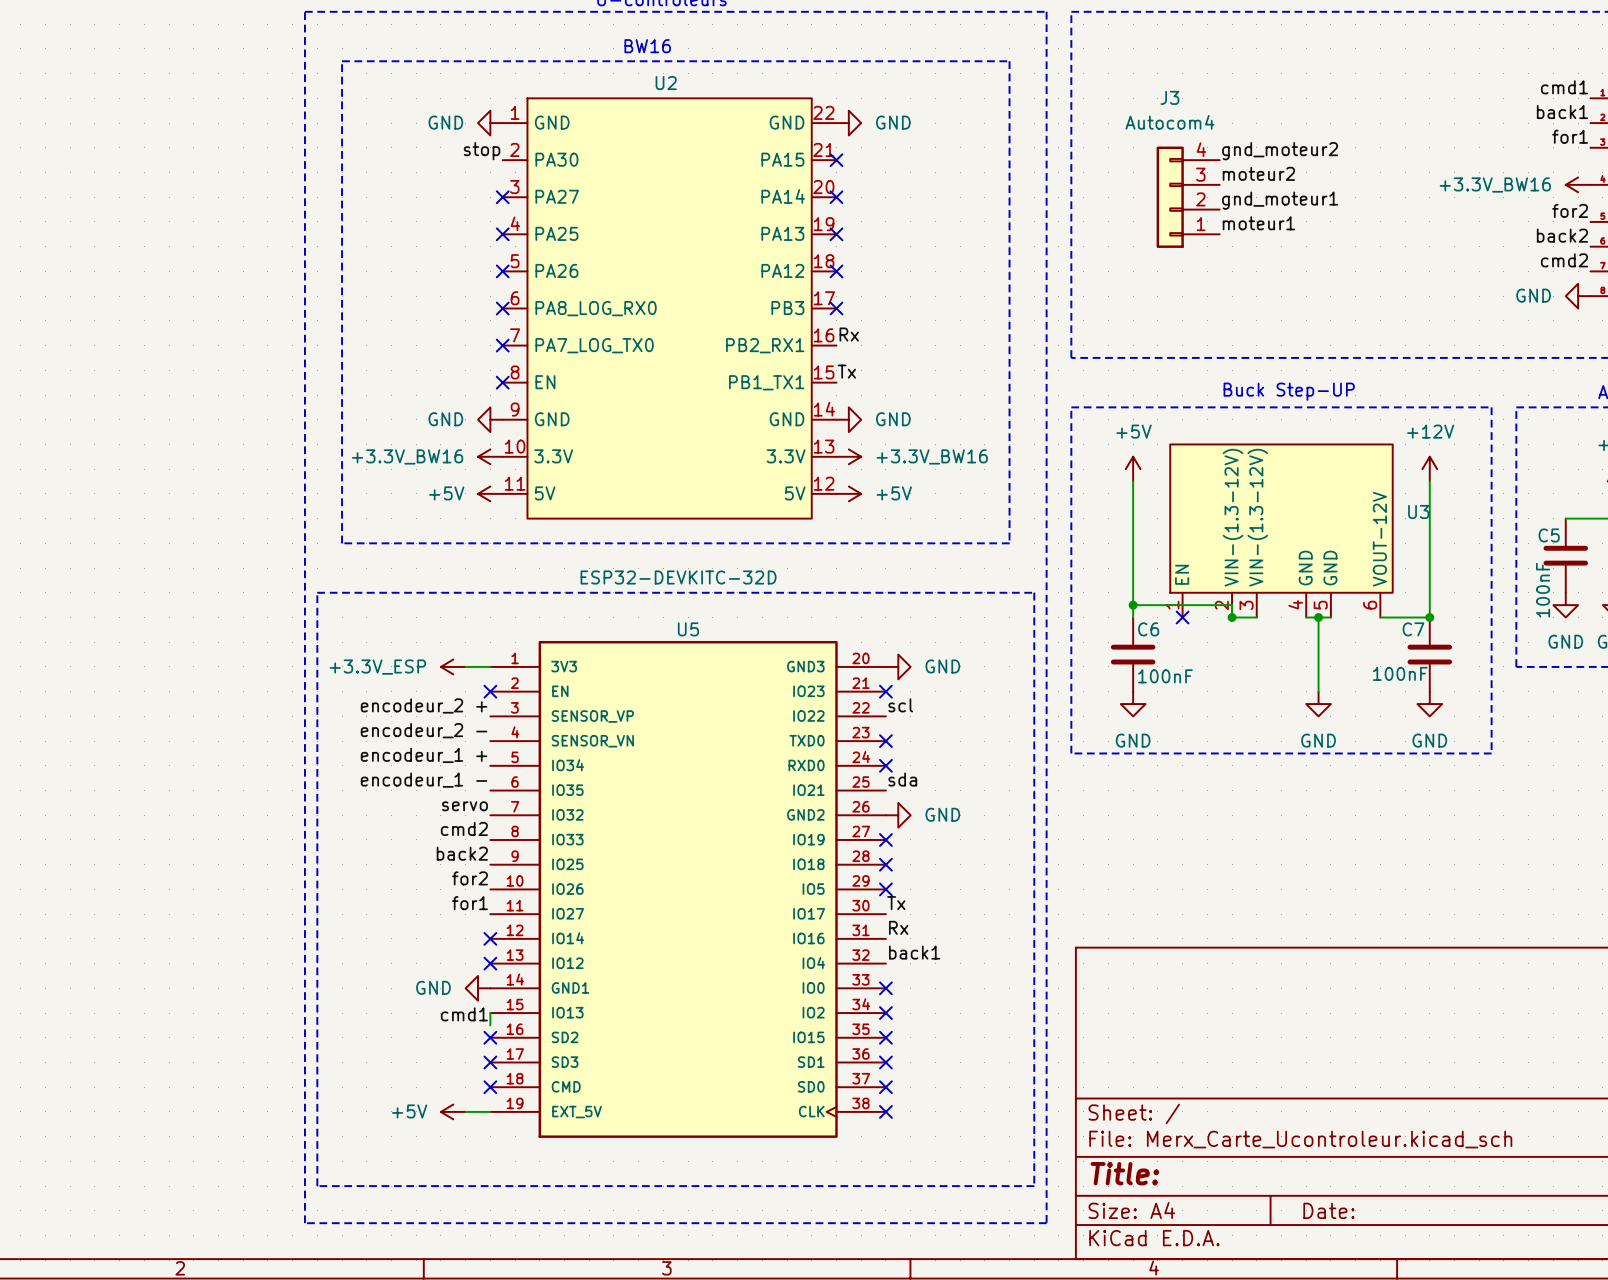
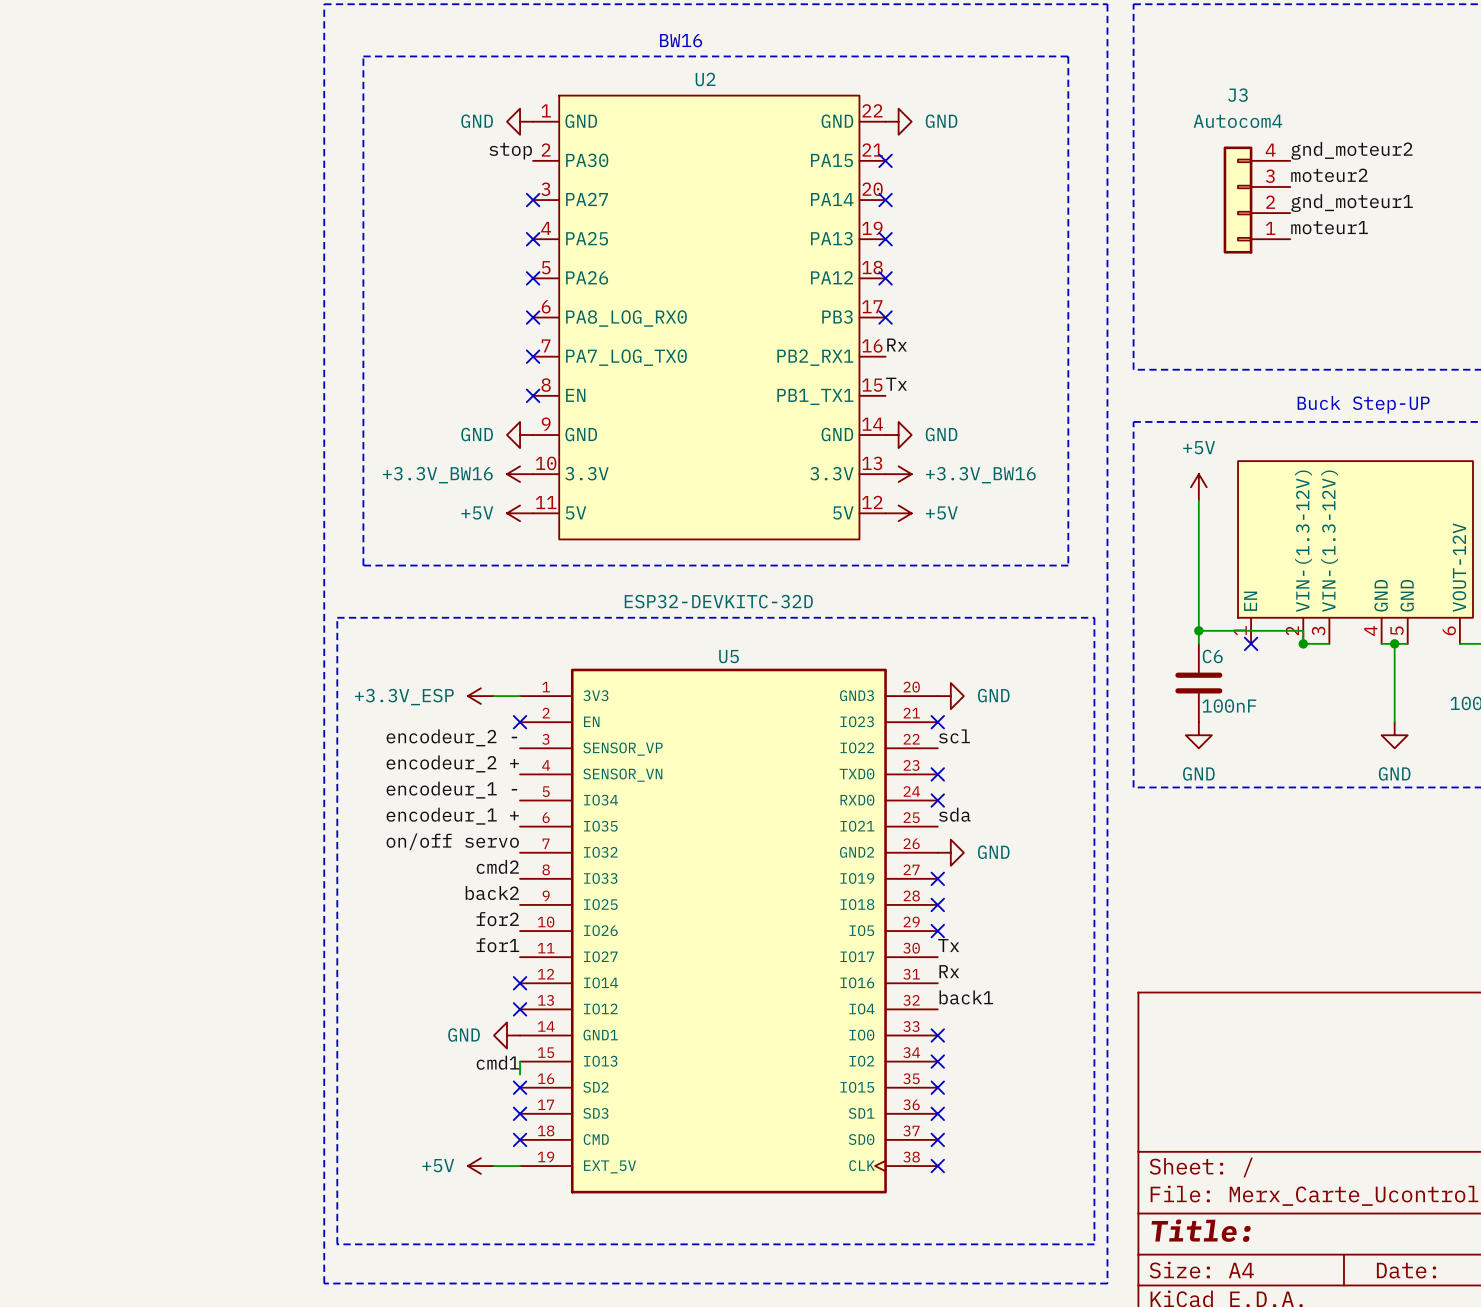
label: encodeur_2 + (424, 705) -> encodeur_2 - (451, 737)
label: encodeur_2 - (424, 730) -> encodeur_2 + (452, 763)
label: encodeur_1 + (424, 755) -> encodeur_1 - (451, 790)
label: encodeur_1 - (424, 780) -> encodeur_1 + (452, 816)
label: servo (464, 806) -> on/off servo (452, 841)

